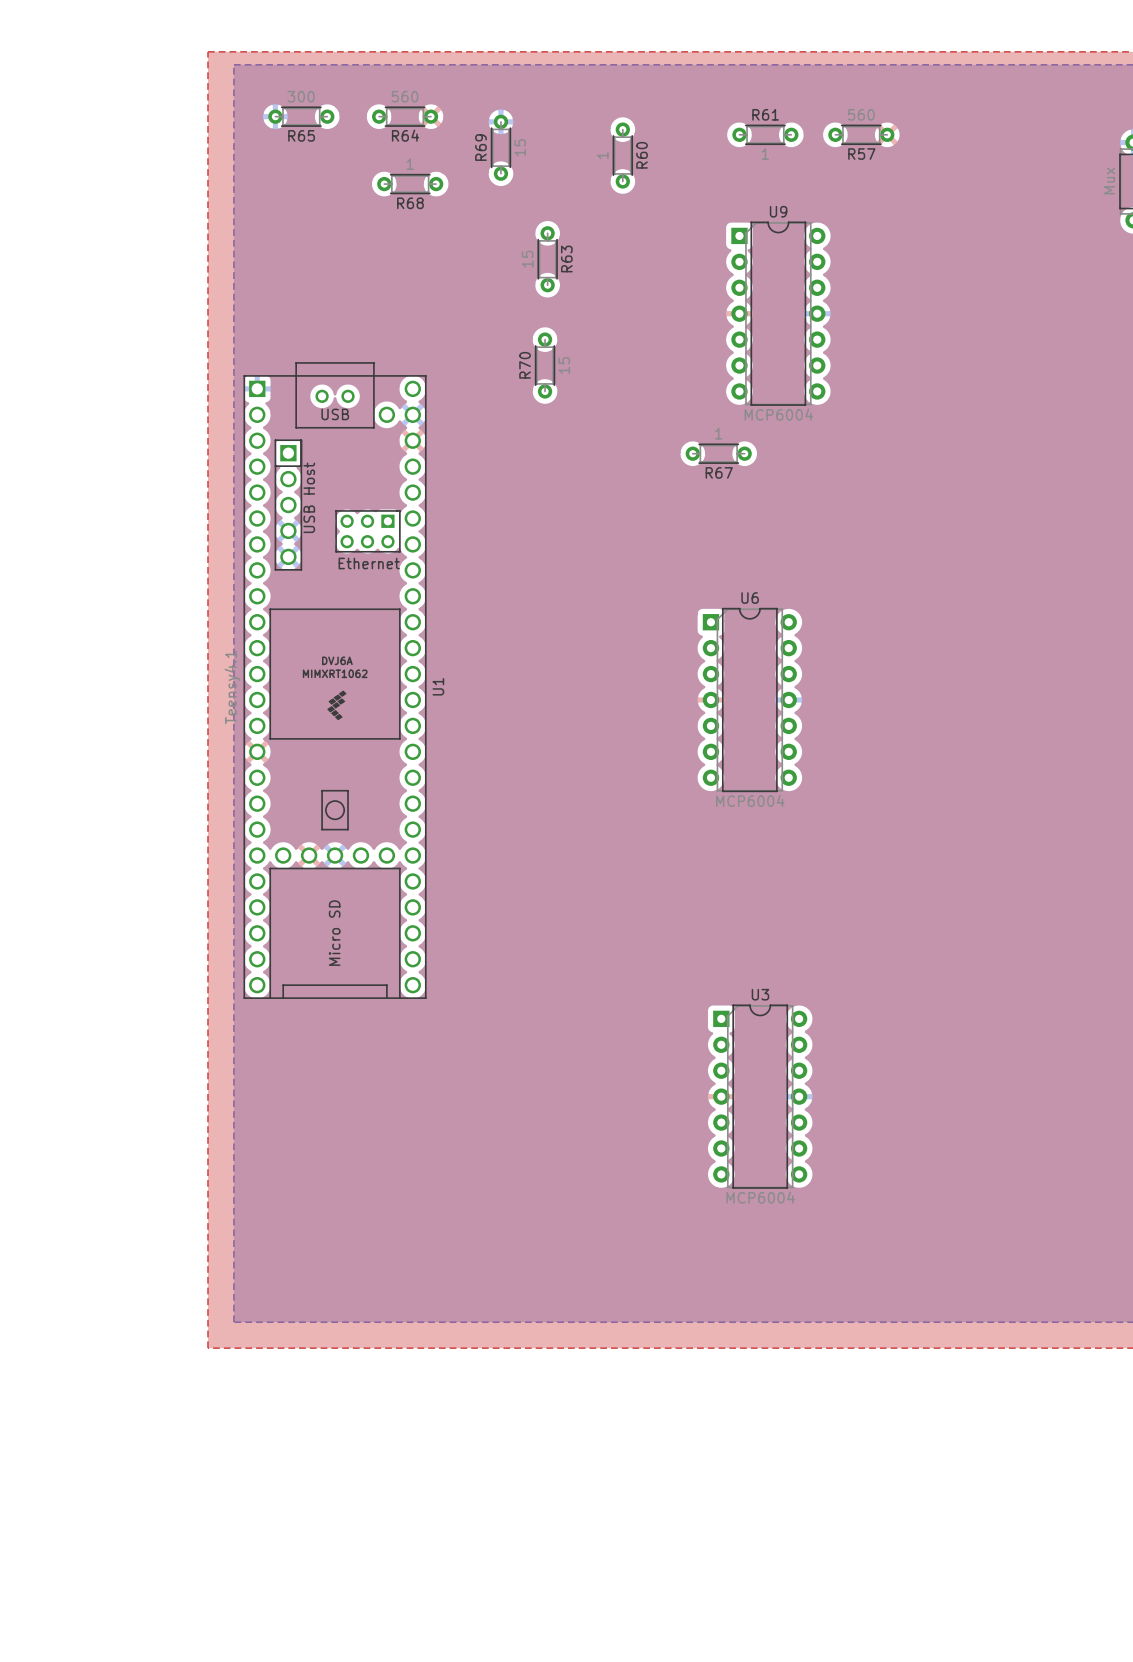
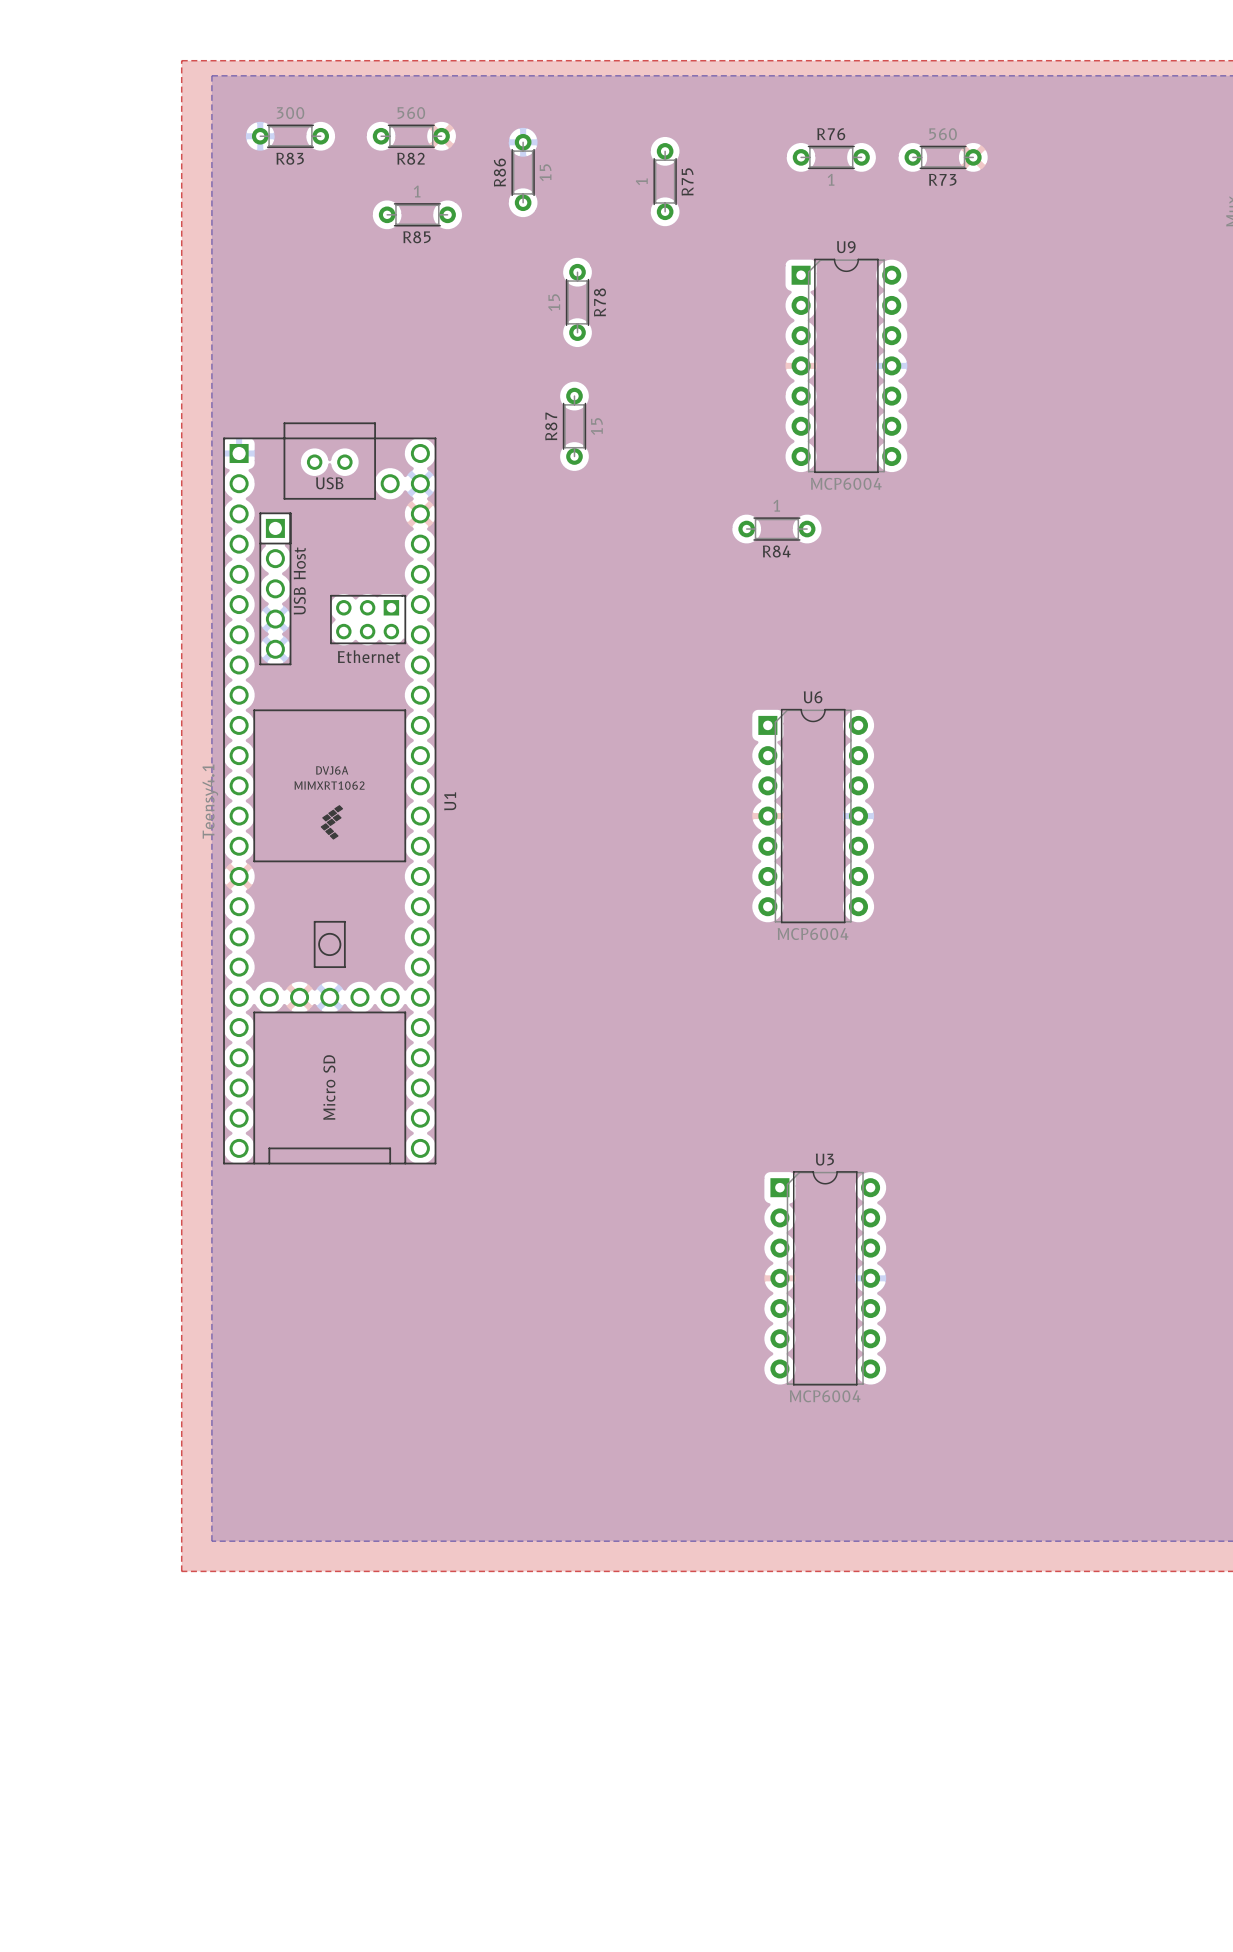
R61 name: R61 (765, 114) -> R76 (831, 134)
R65 name: R65 (301, 135) -> R83 (290, 158)
R64 name: R64 (405, 135) -> R82 (410, 158)
R69 name: R69 (480, 147) -> R86 (499, 172)
R57 name: R57 (861, 154) -> R73 (942, 179)
R60 name: R60 (642, 155) -> R75 (687, 181)
R68 name: R68 (410, 203) -> R85 (417, 237)
R63 name: R63 (566, 259) -> R78 (599, 302)
R70 name: R70 (525, 365) -> R87 (551, 426)
R67 name: R67 (719, 472) -> R84 (776, 551)

